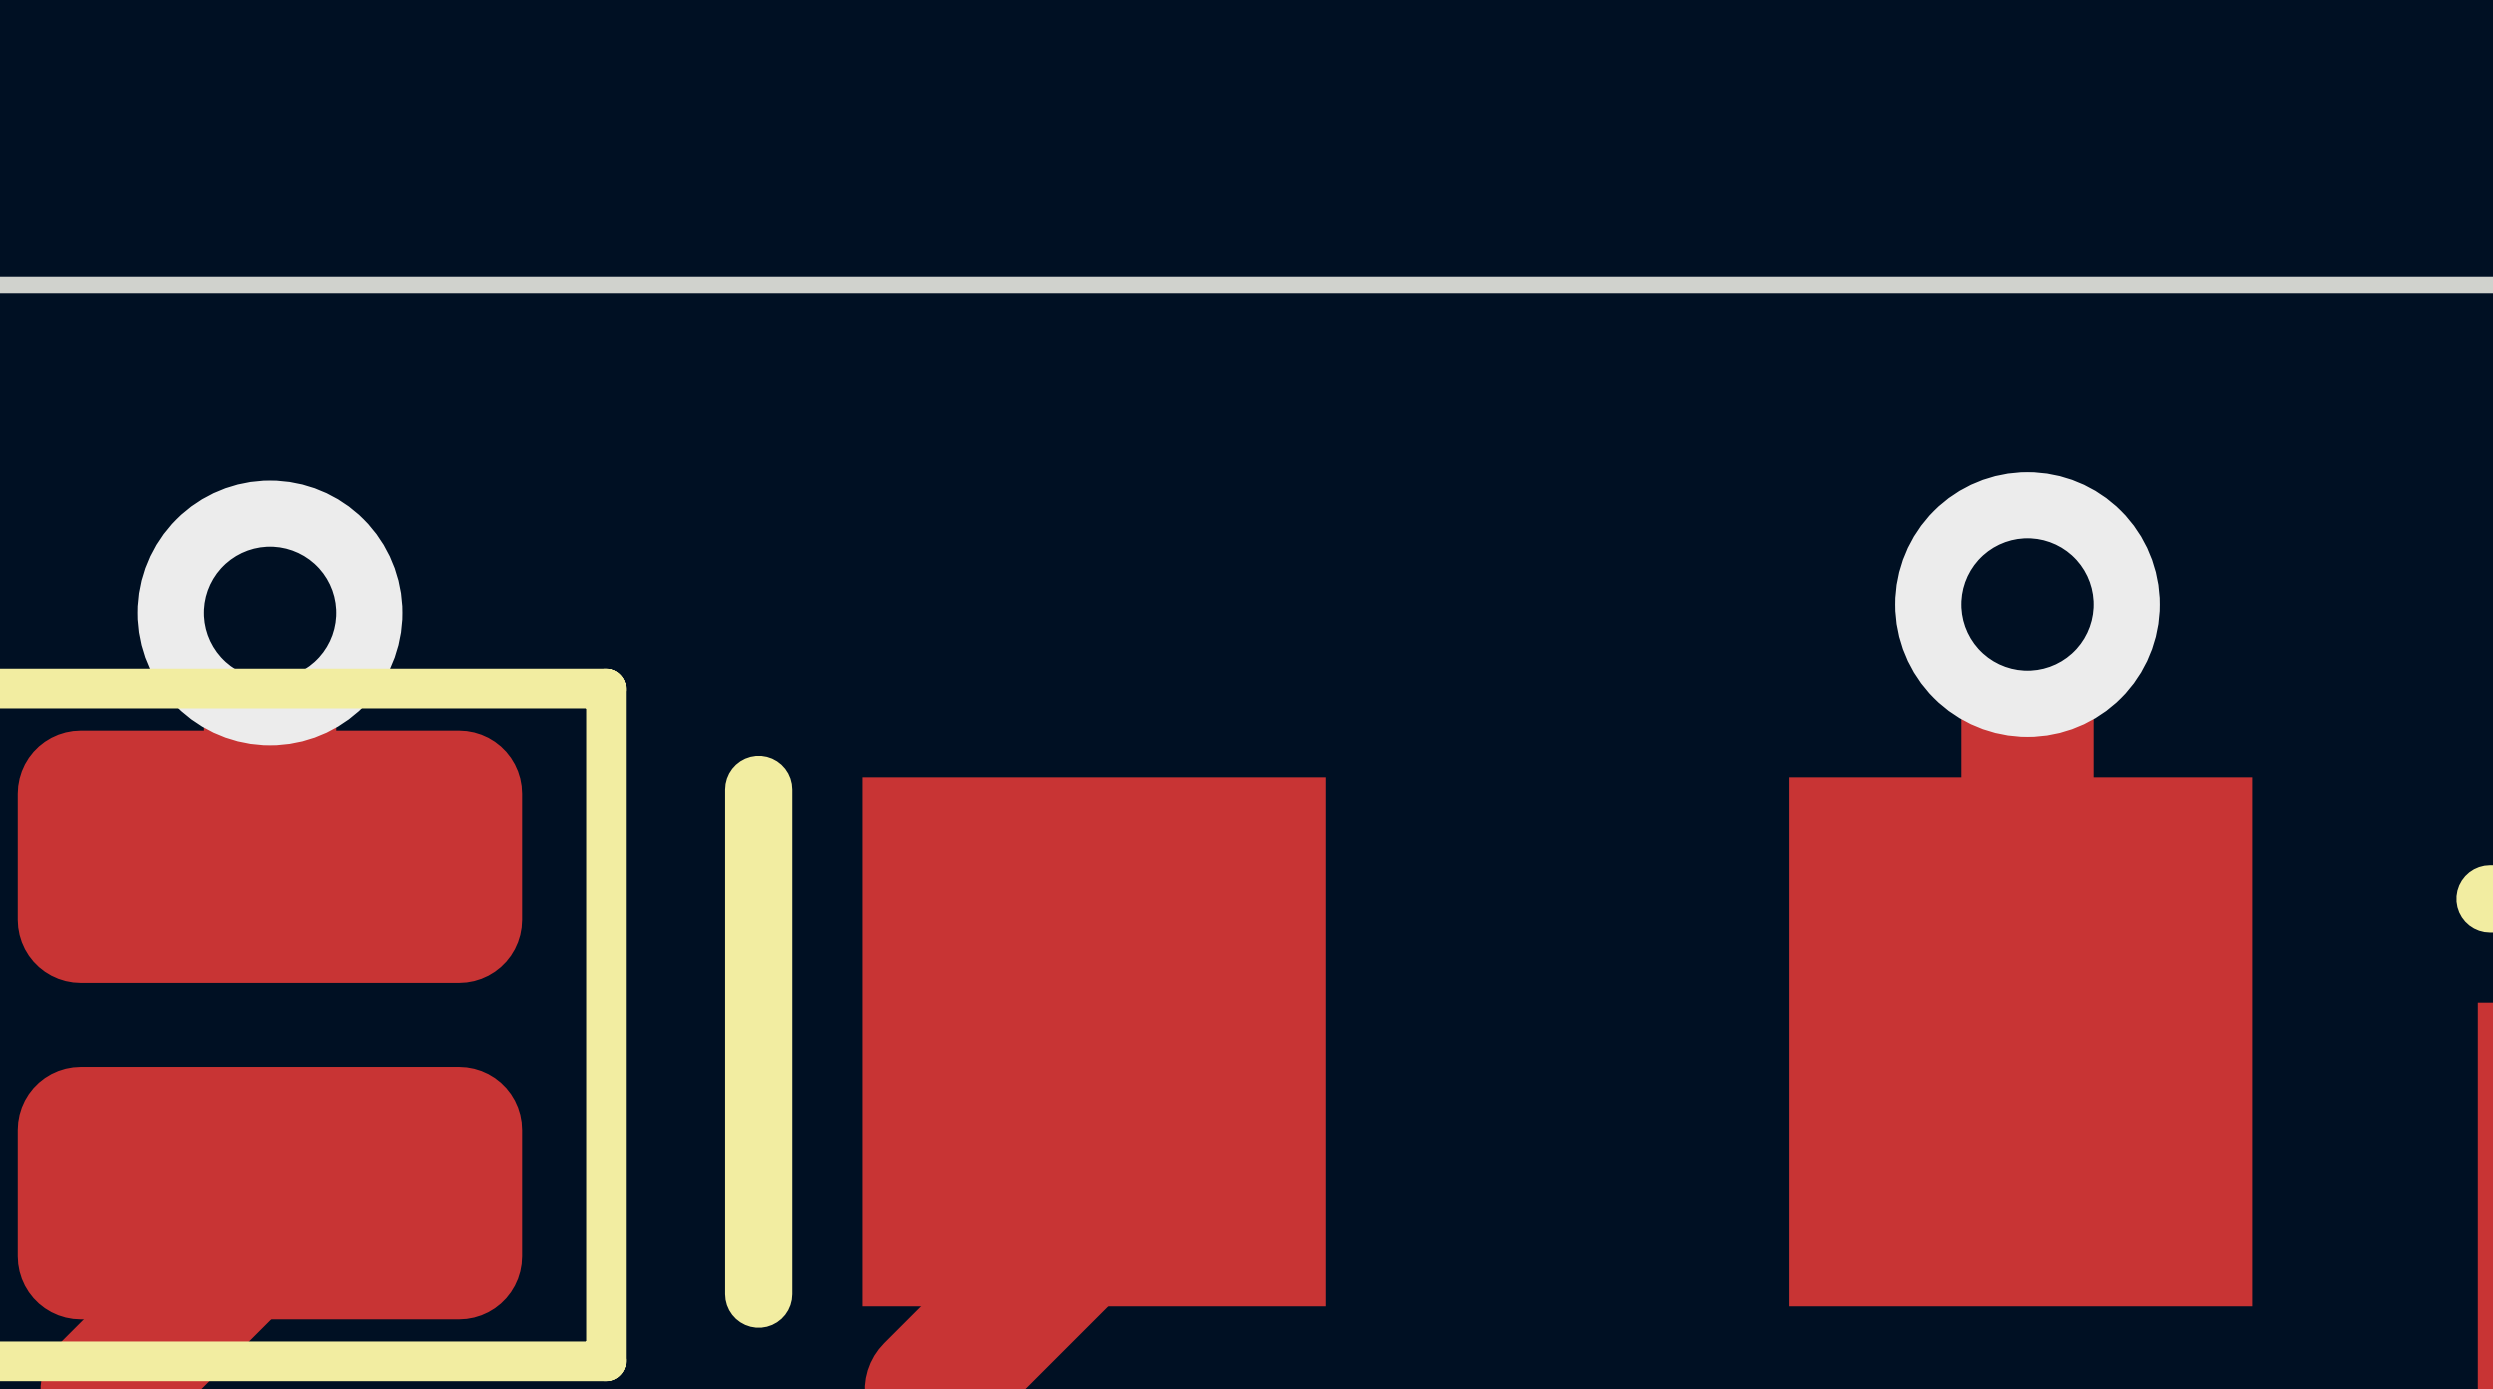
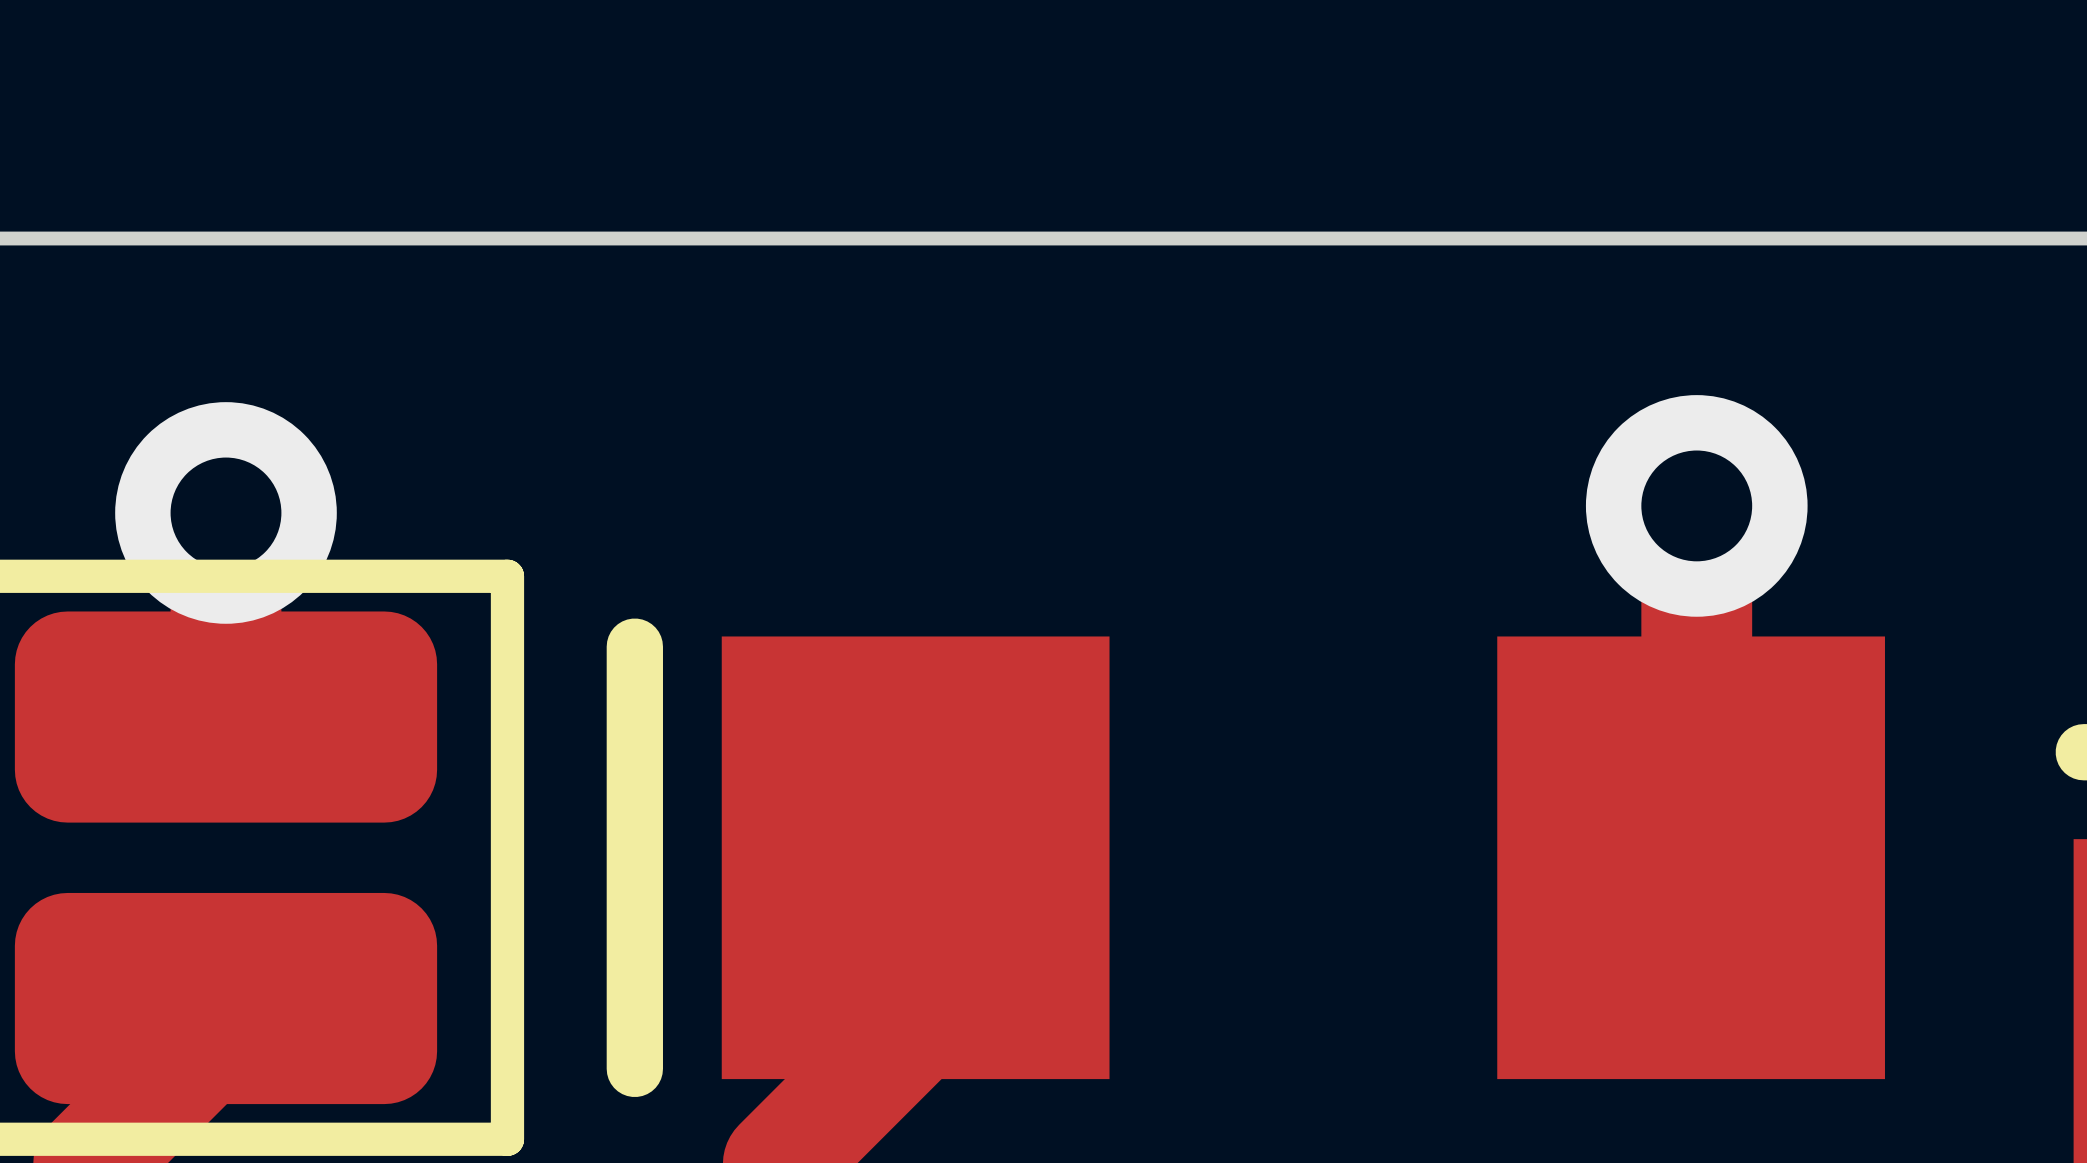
part position: (1488, 1041) -> (1245, 857)

